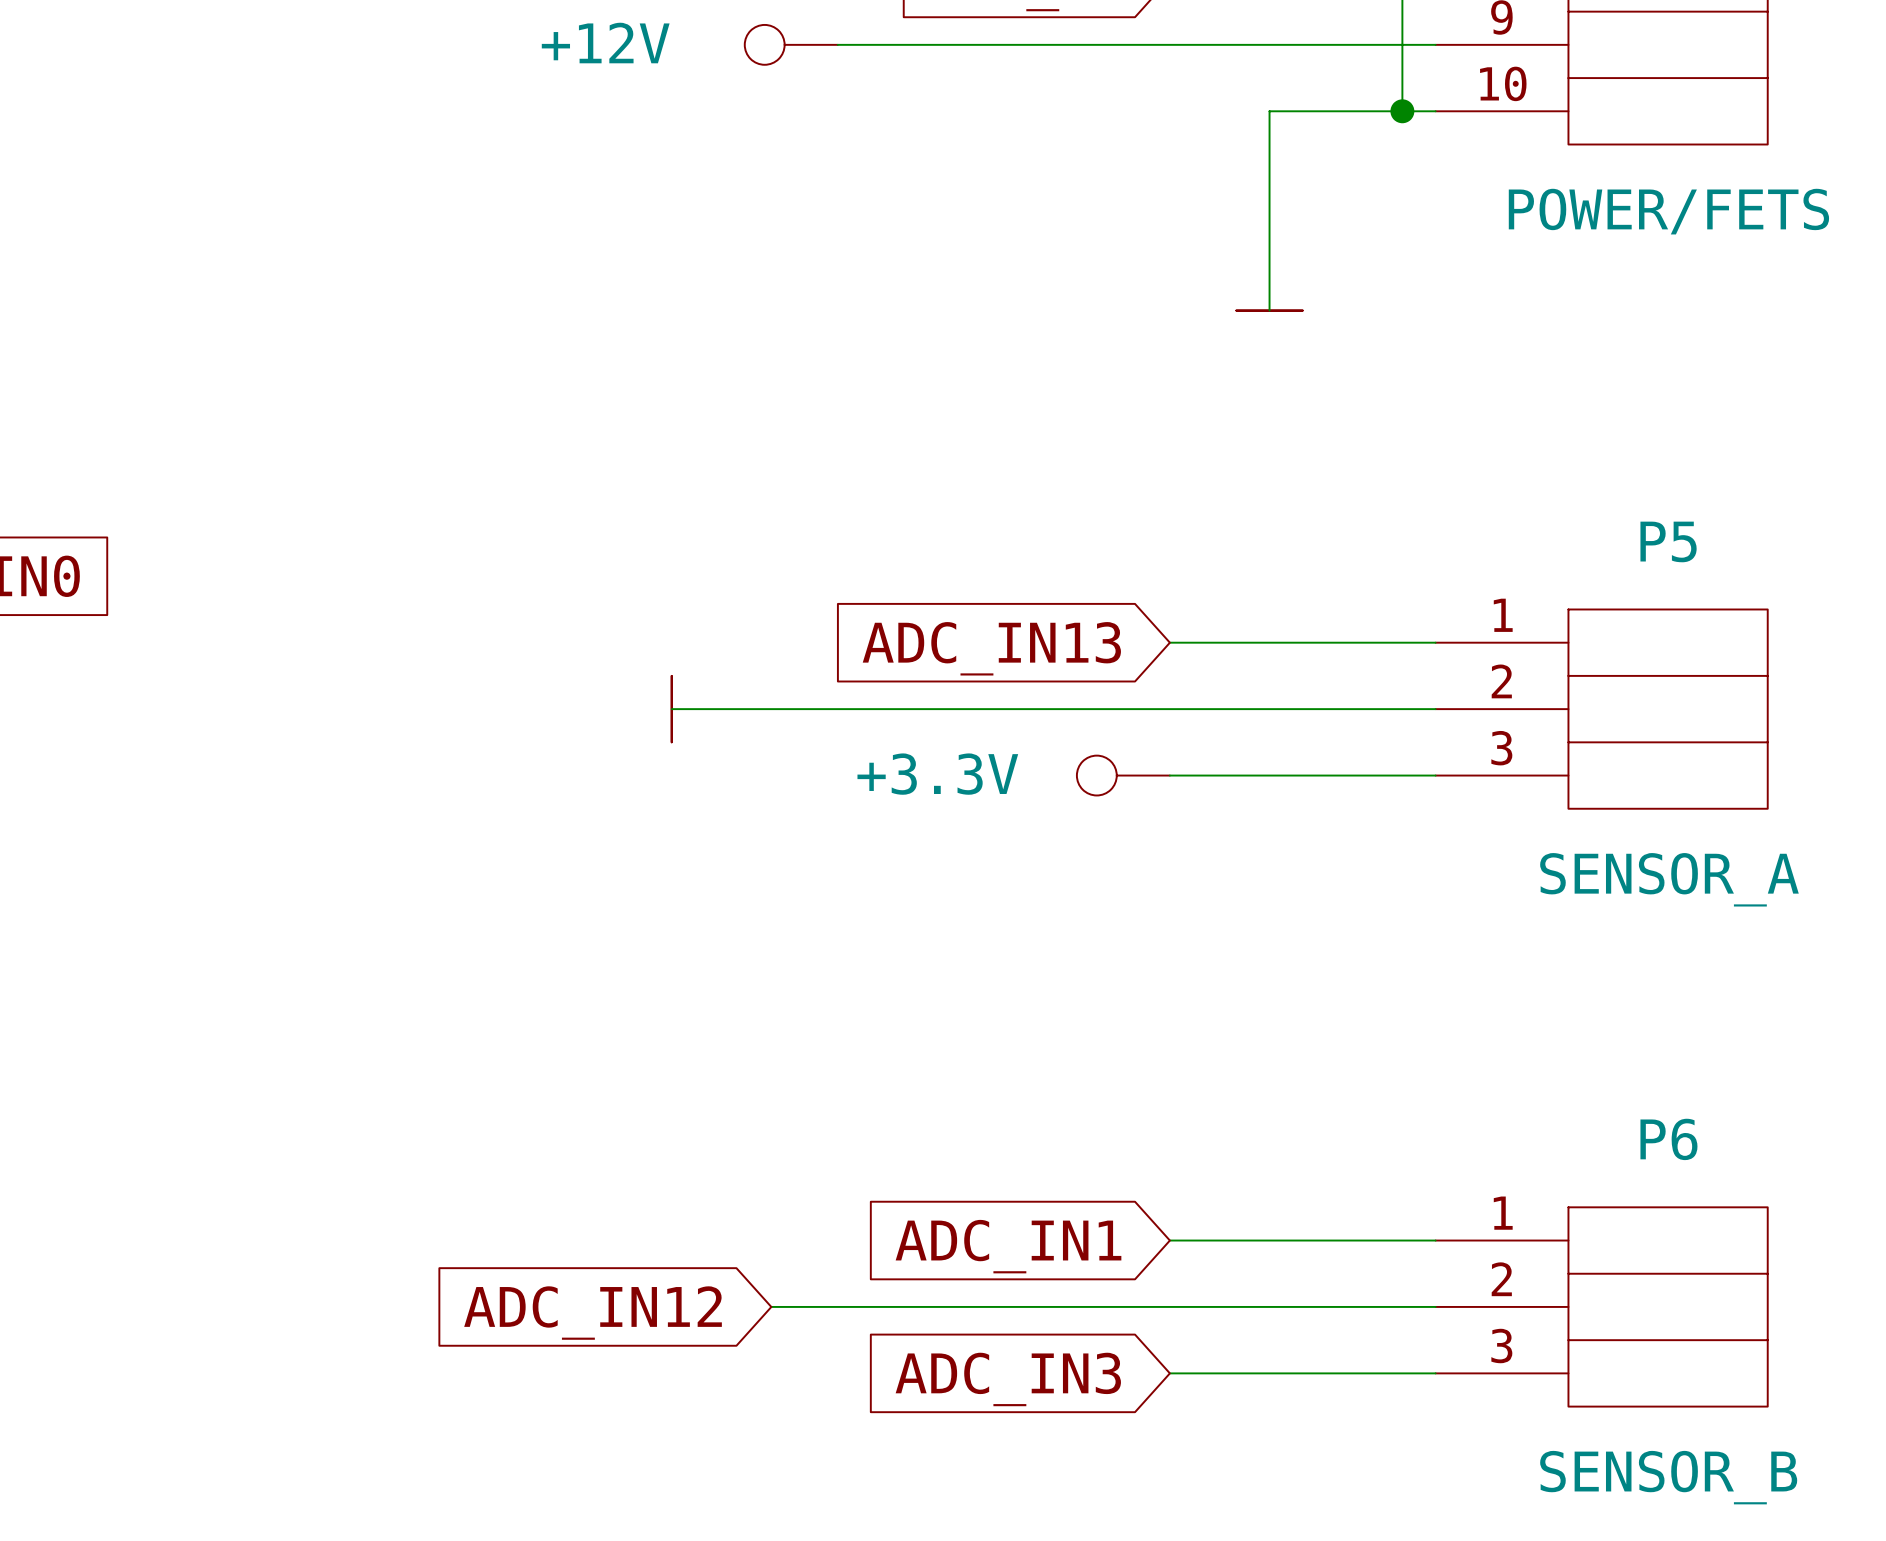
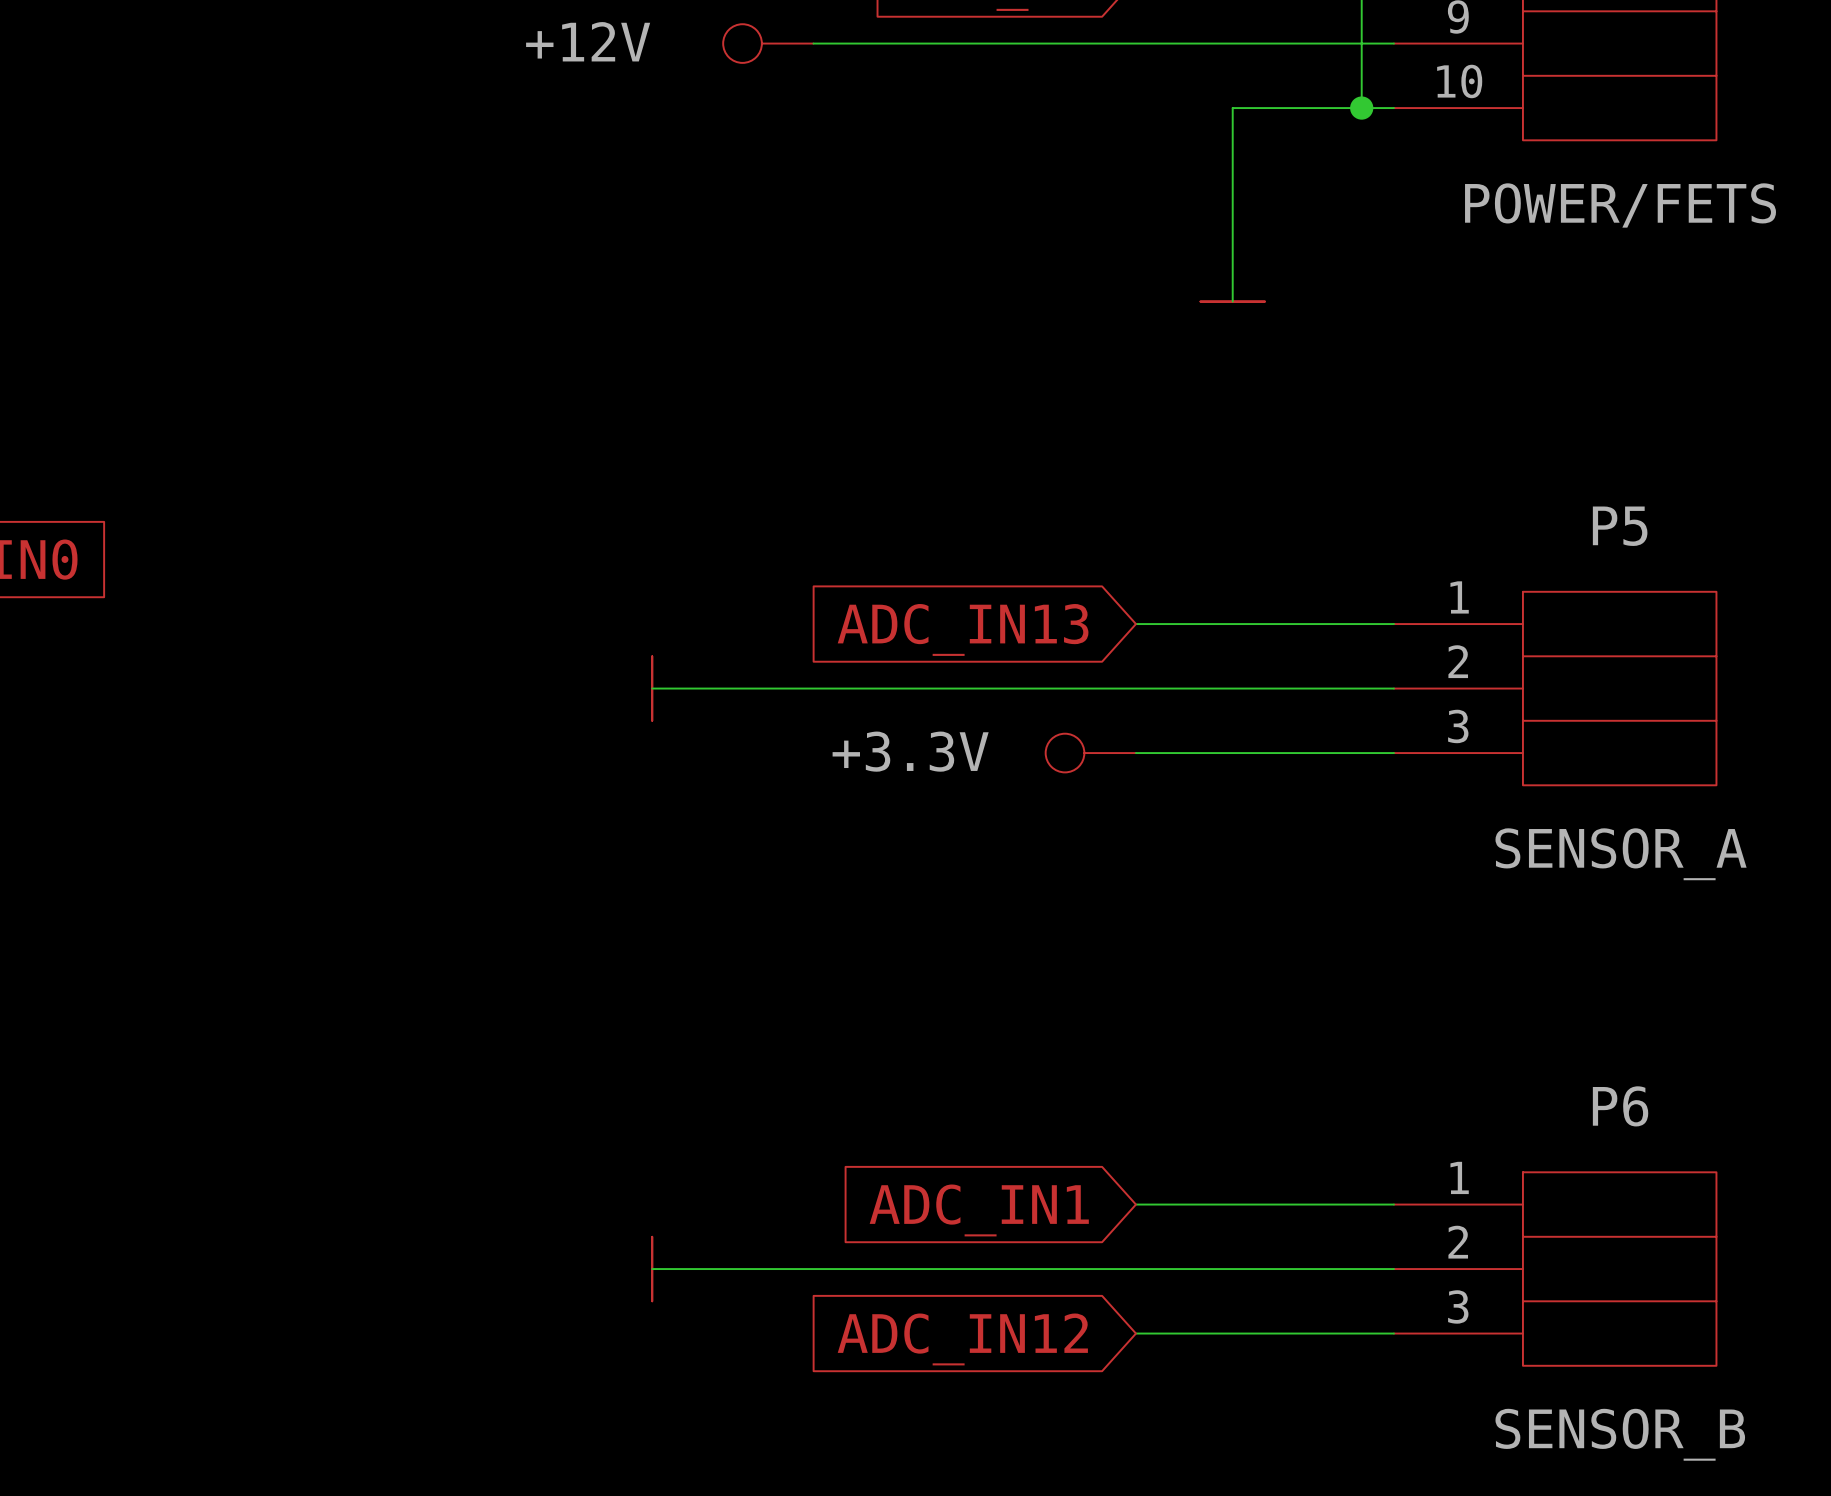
wire: none -> (652, 1269) (748, 1269)
power symbol: none -> (652, 1269)
global label: ADC_IN12 (593, 1313) -> none
global label: ADC_IN3 (1008, 1379) -> ADC_IN12 (962, 1339)

